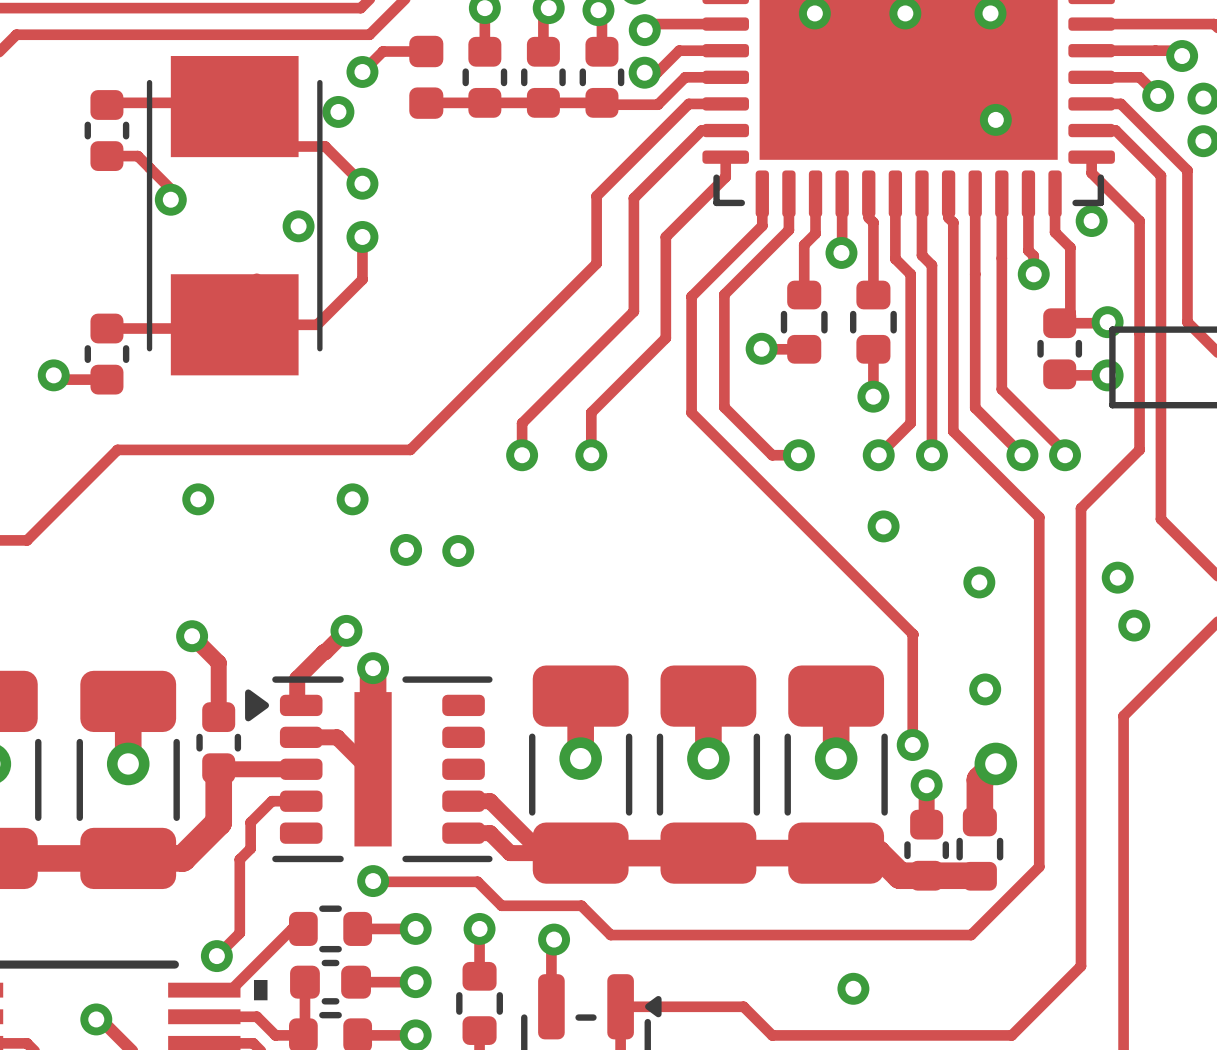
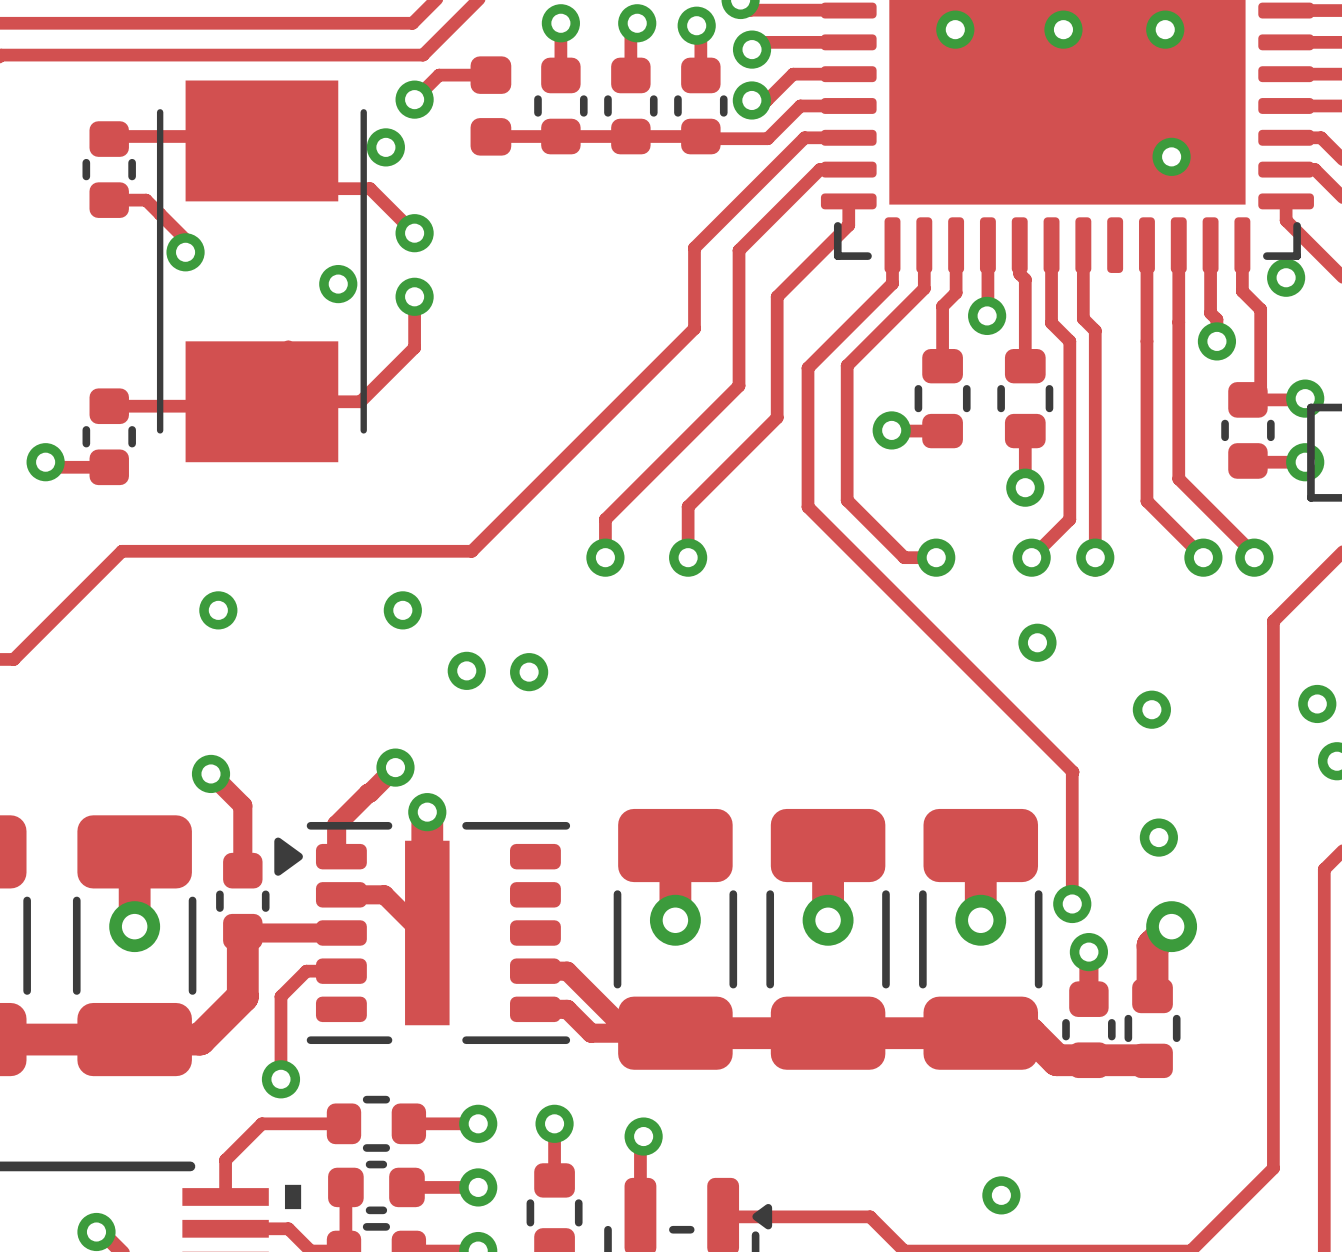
track: (948, 193) (948, 217) (953, 222) (953, 431) (1039, 517) (1039, 866) (971, 935) (610, 935) (581, 905) (501, 905) (477, 881) (373, 881) -> none
track: (250, 848) (239, 859) (239, 933) (216, 956) -> (280, 1027) (280, 1079)
via: (373, 881) -> none
via: none -> (280, 1079)
track: (292, 928) (230, 990) (204, 990) -> (330, 1123) (261, 1123) (225, 1160) (225, 1196)
via: (216, 956) -> none

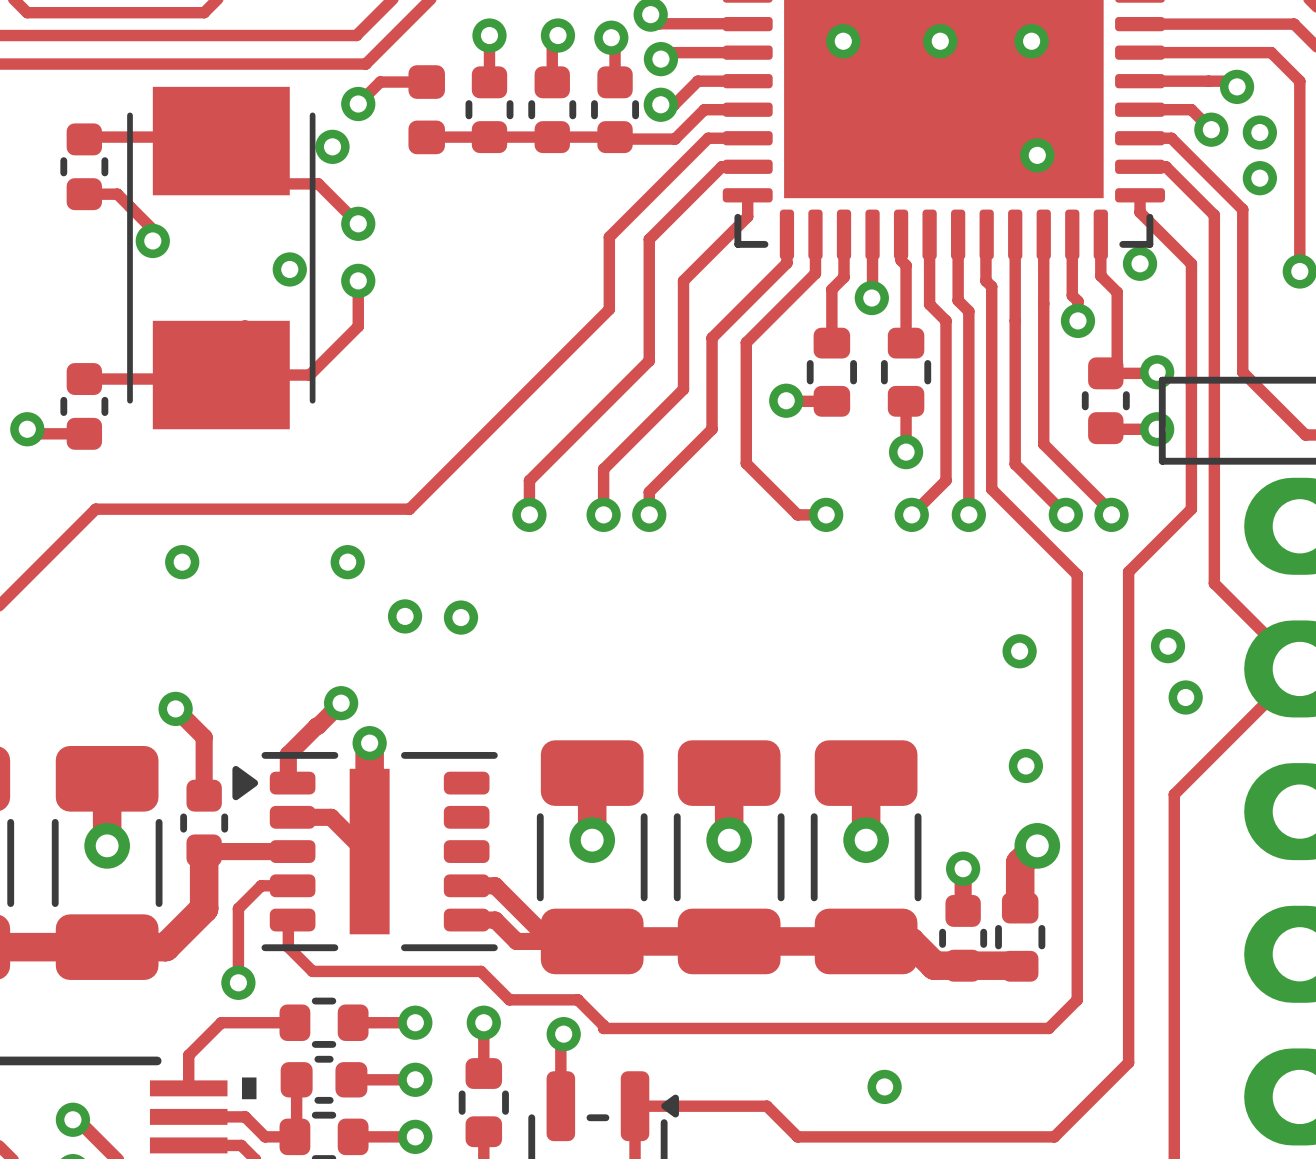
track: none -> (985, 235) (985, 280) (991, 286) (991, 489) (1077, 574) (1077, 999) (1048, 1028) (603, 1028) (603, 1025) (577, 999) (509, 999) (480, 971) (312, 971) (288, 947) (288, 920)
track: (892, 276) (892, 283) (808, 368) (808, 507) (1073, 772) -> (786, 263) (712, 337) (712, 429) (649, 492) (649, 514)
via: none -> (649, 514)
via: (1037, 642) -> none
track: (1072, 772) (1072, 903) -> none
via: (1072, 903) -> none

